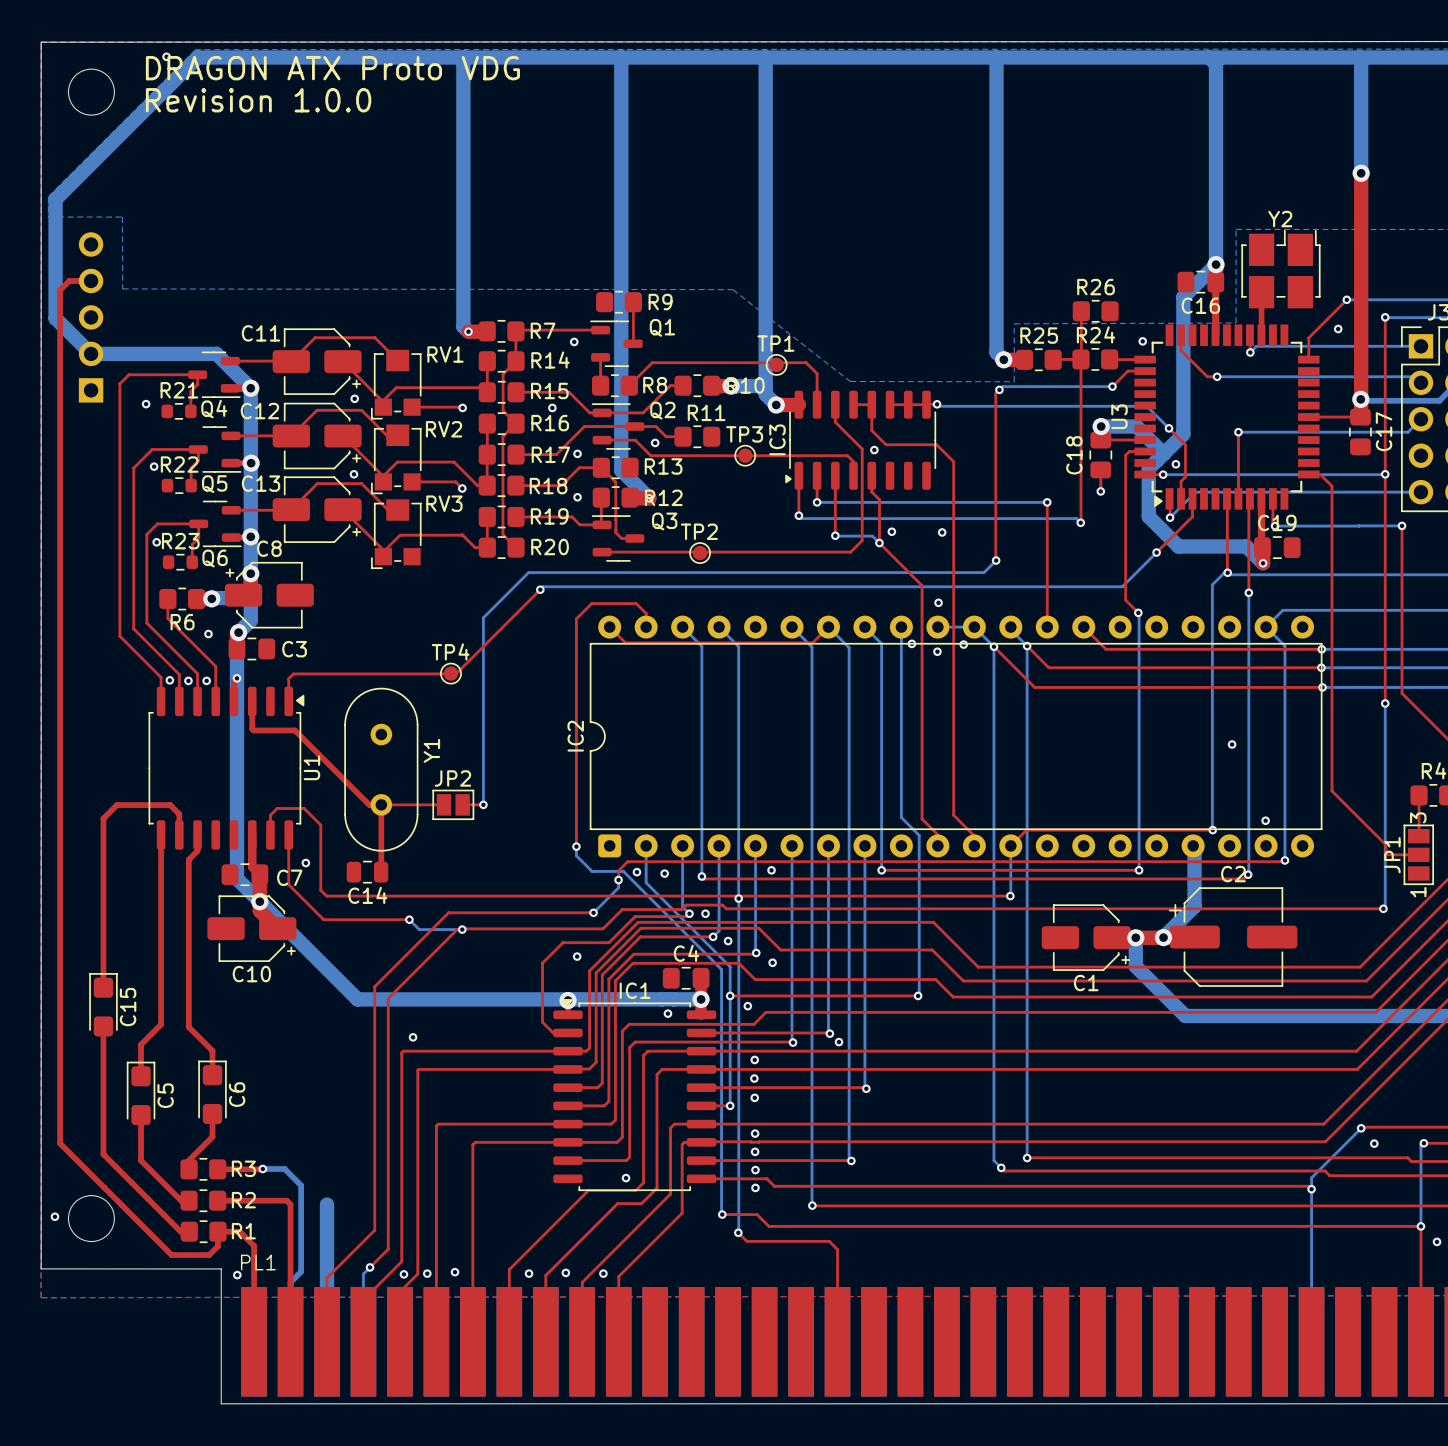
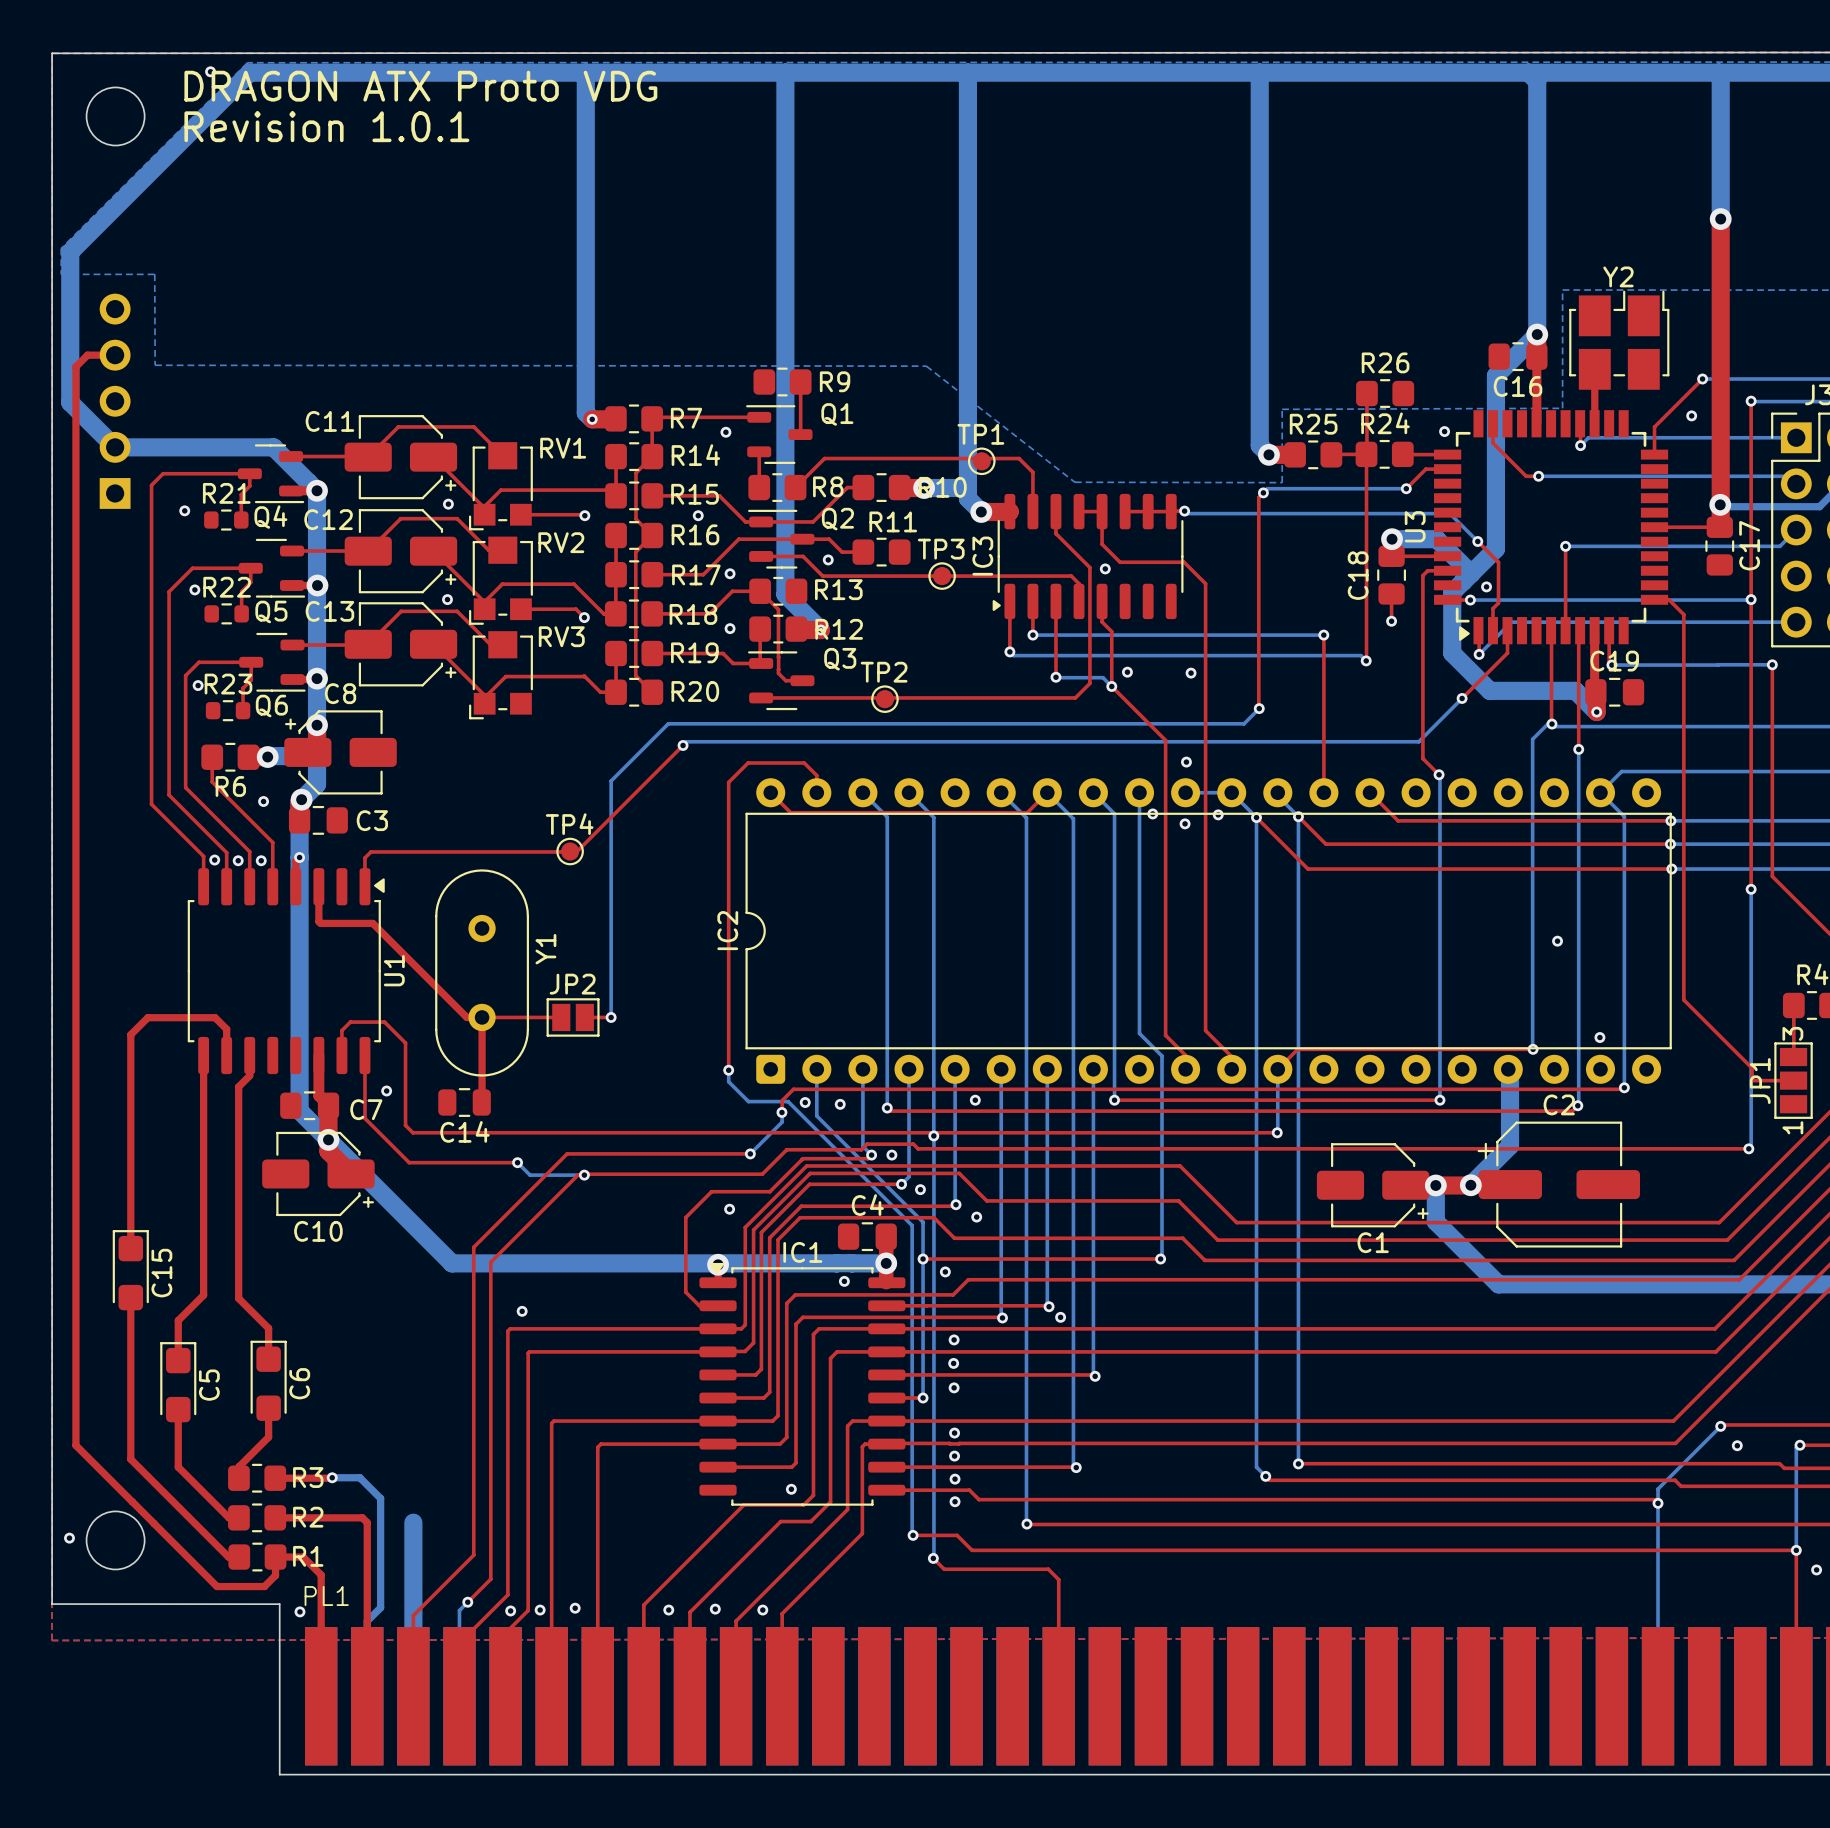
text: Revision 1.0.0 (258, 100) -> Revision 1.0.1 (326, 126)

